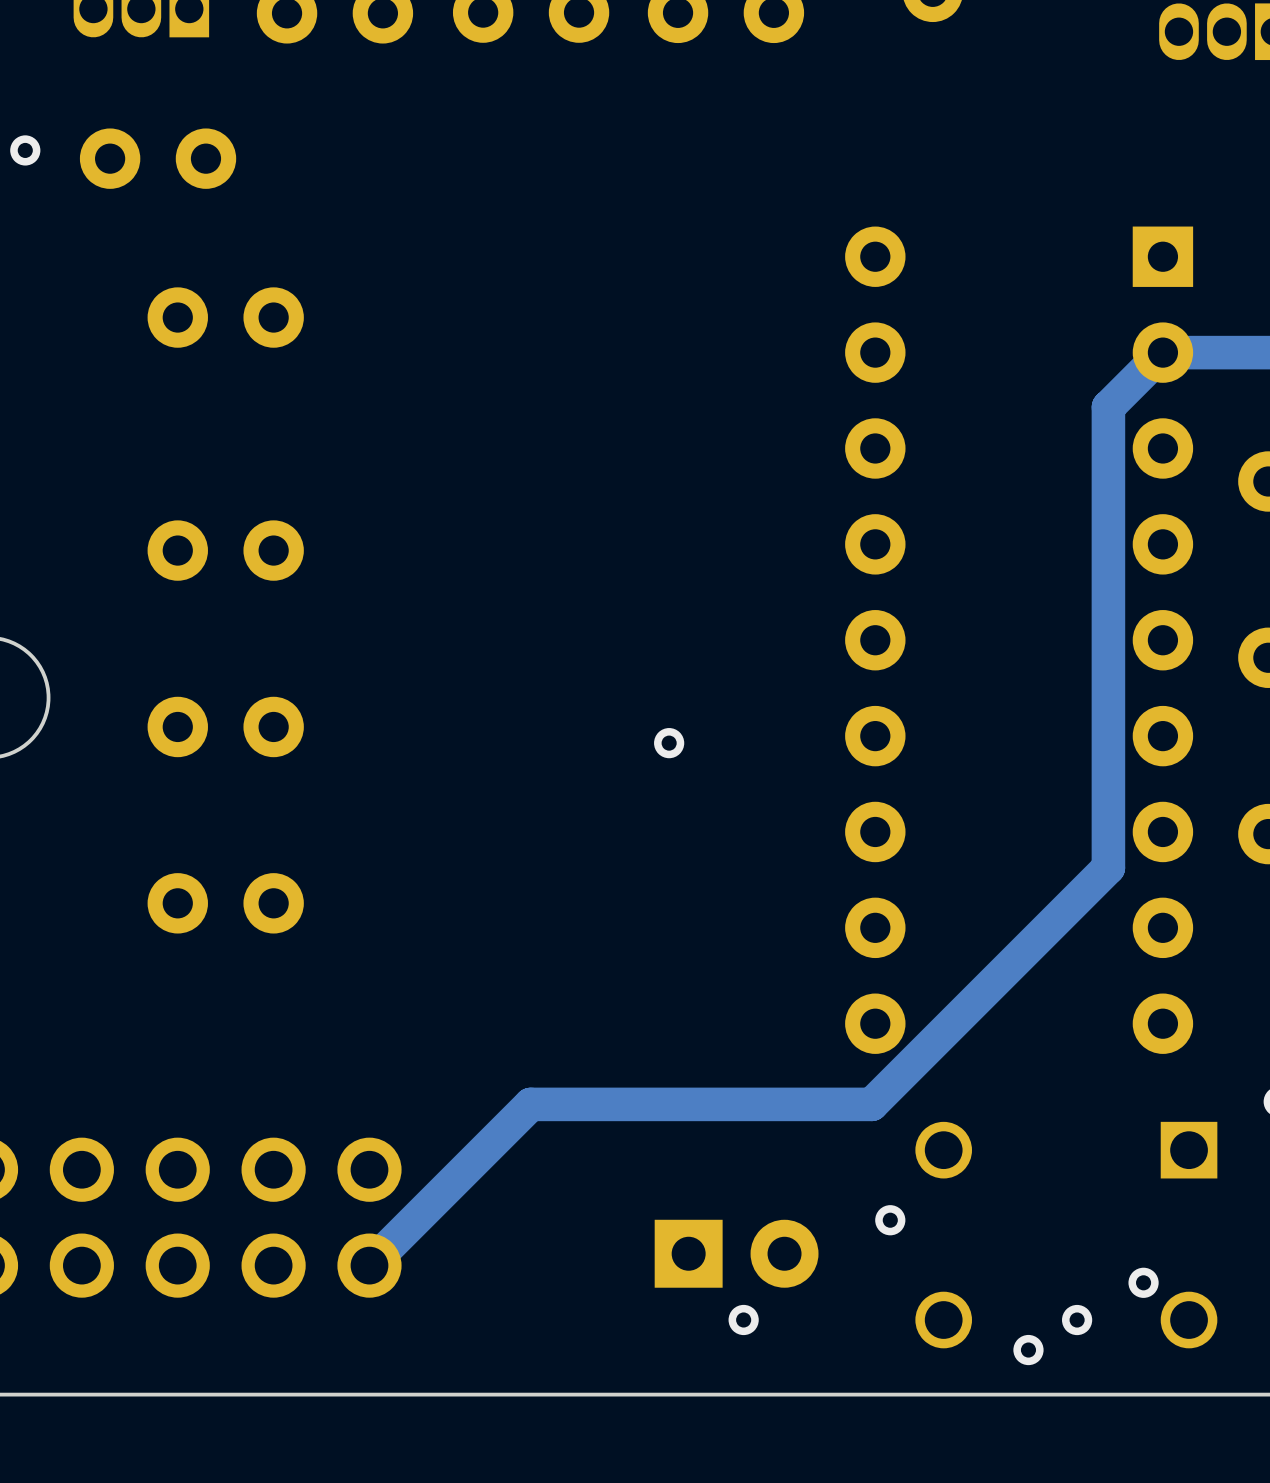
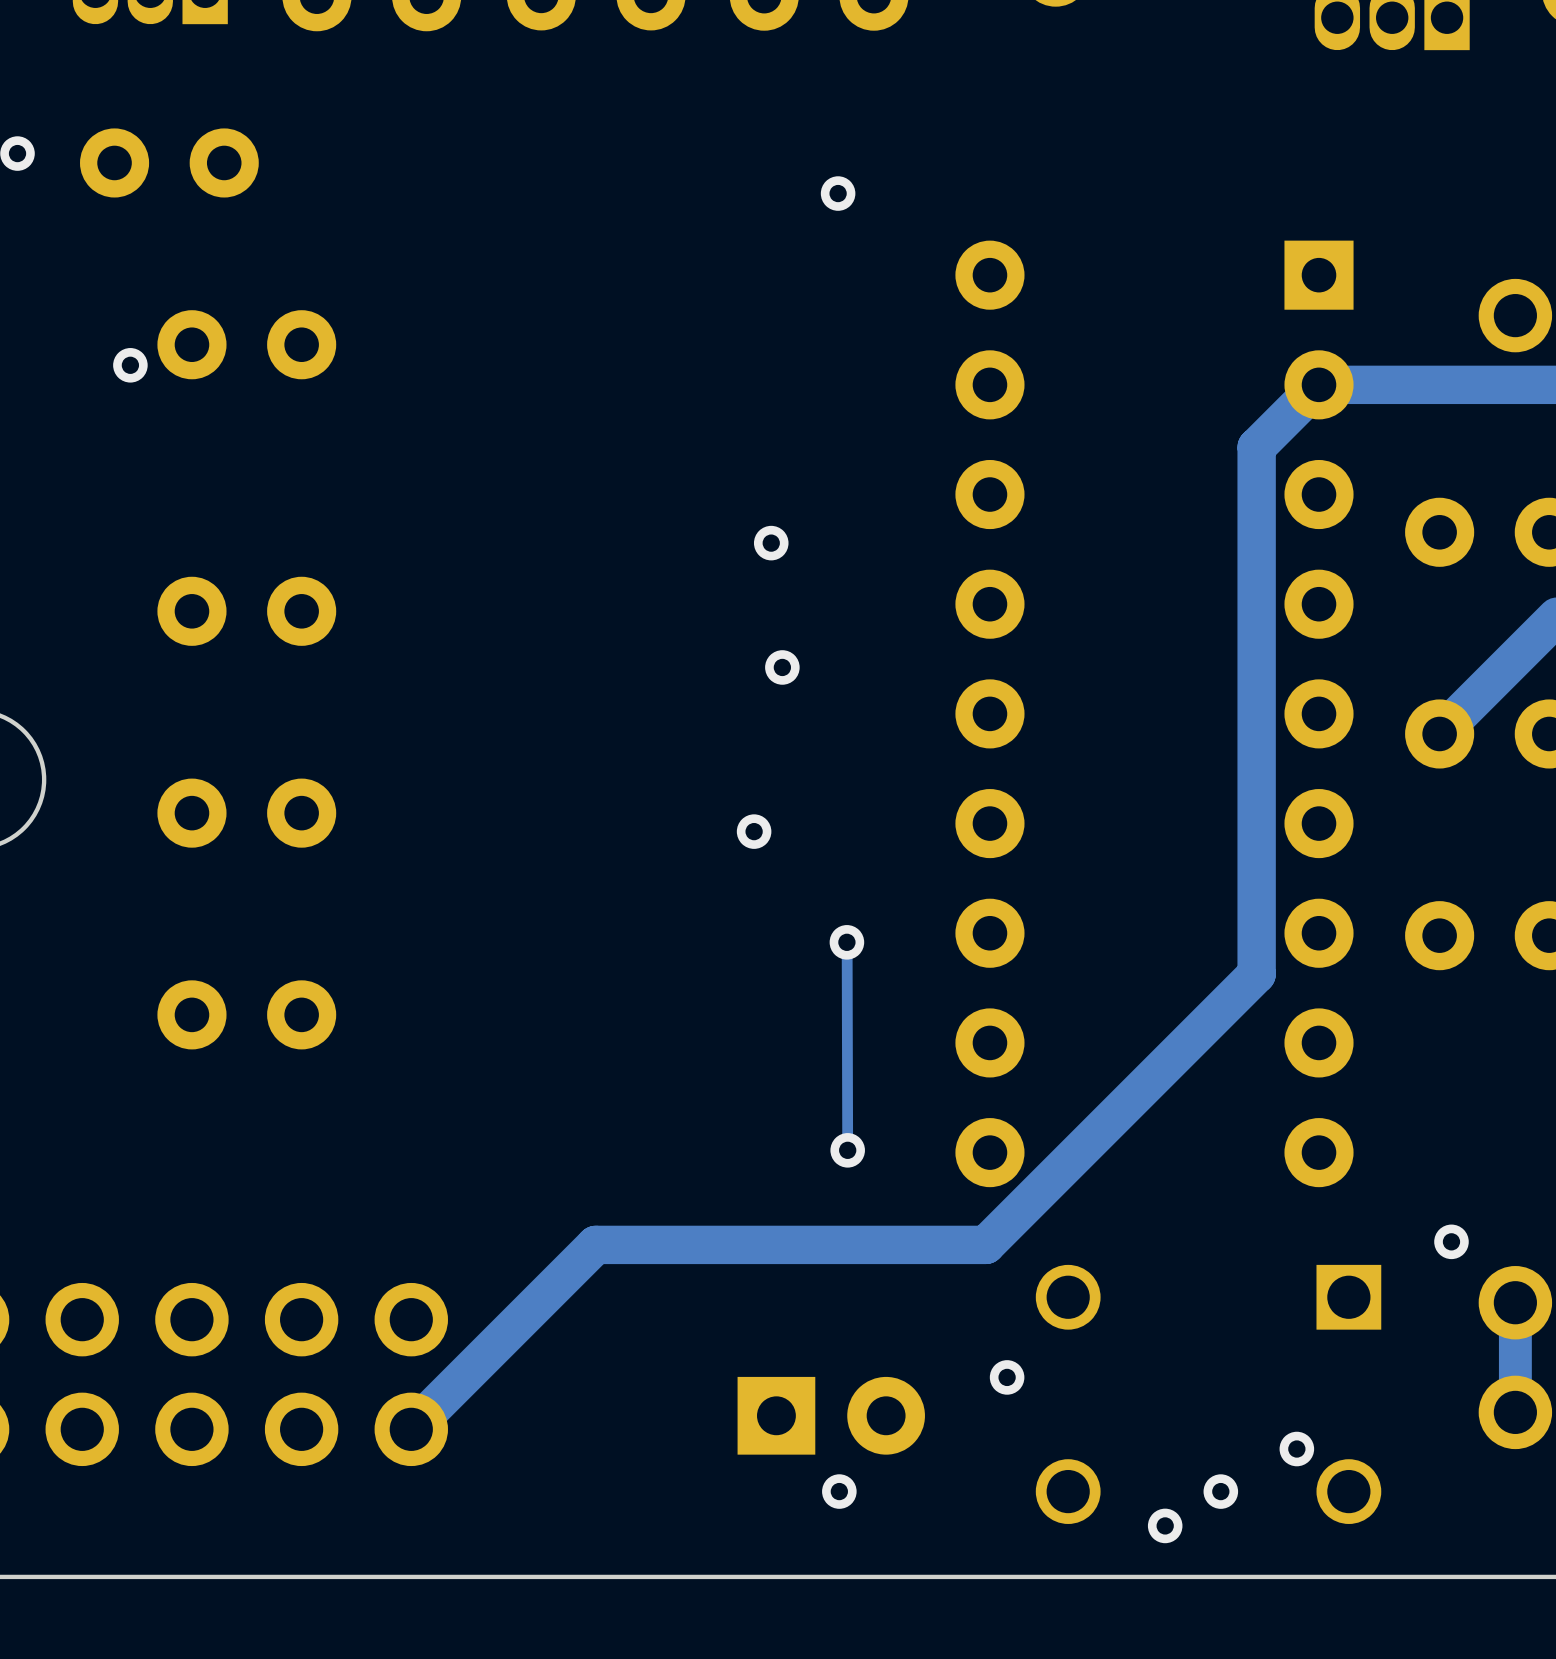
via: none -> (838, 193)
via: none -> (130, 365)
via: none -> (771, 543)
via: none -> (782, 667)
via: none -> (846, 942)
track: none -> (847, 942) (847, 1150)
via: none -> (847, 1150)

